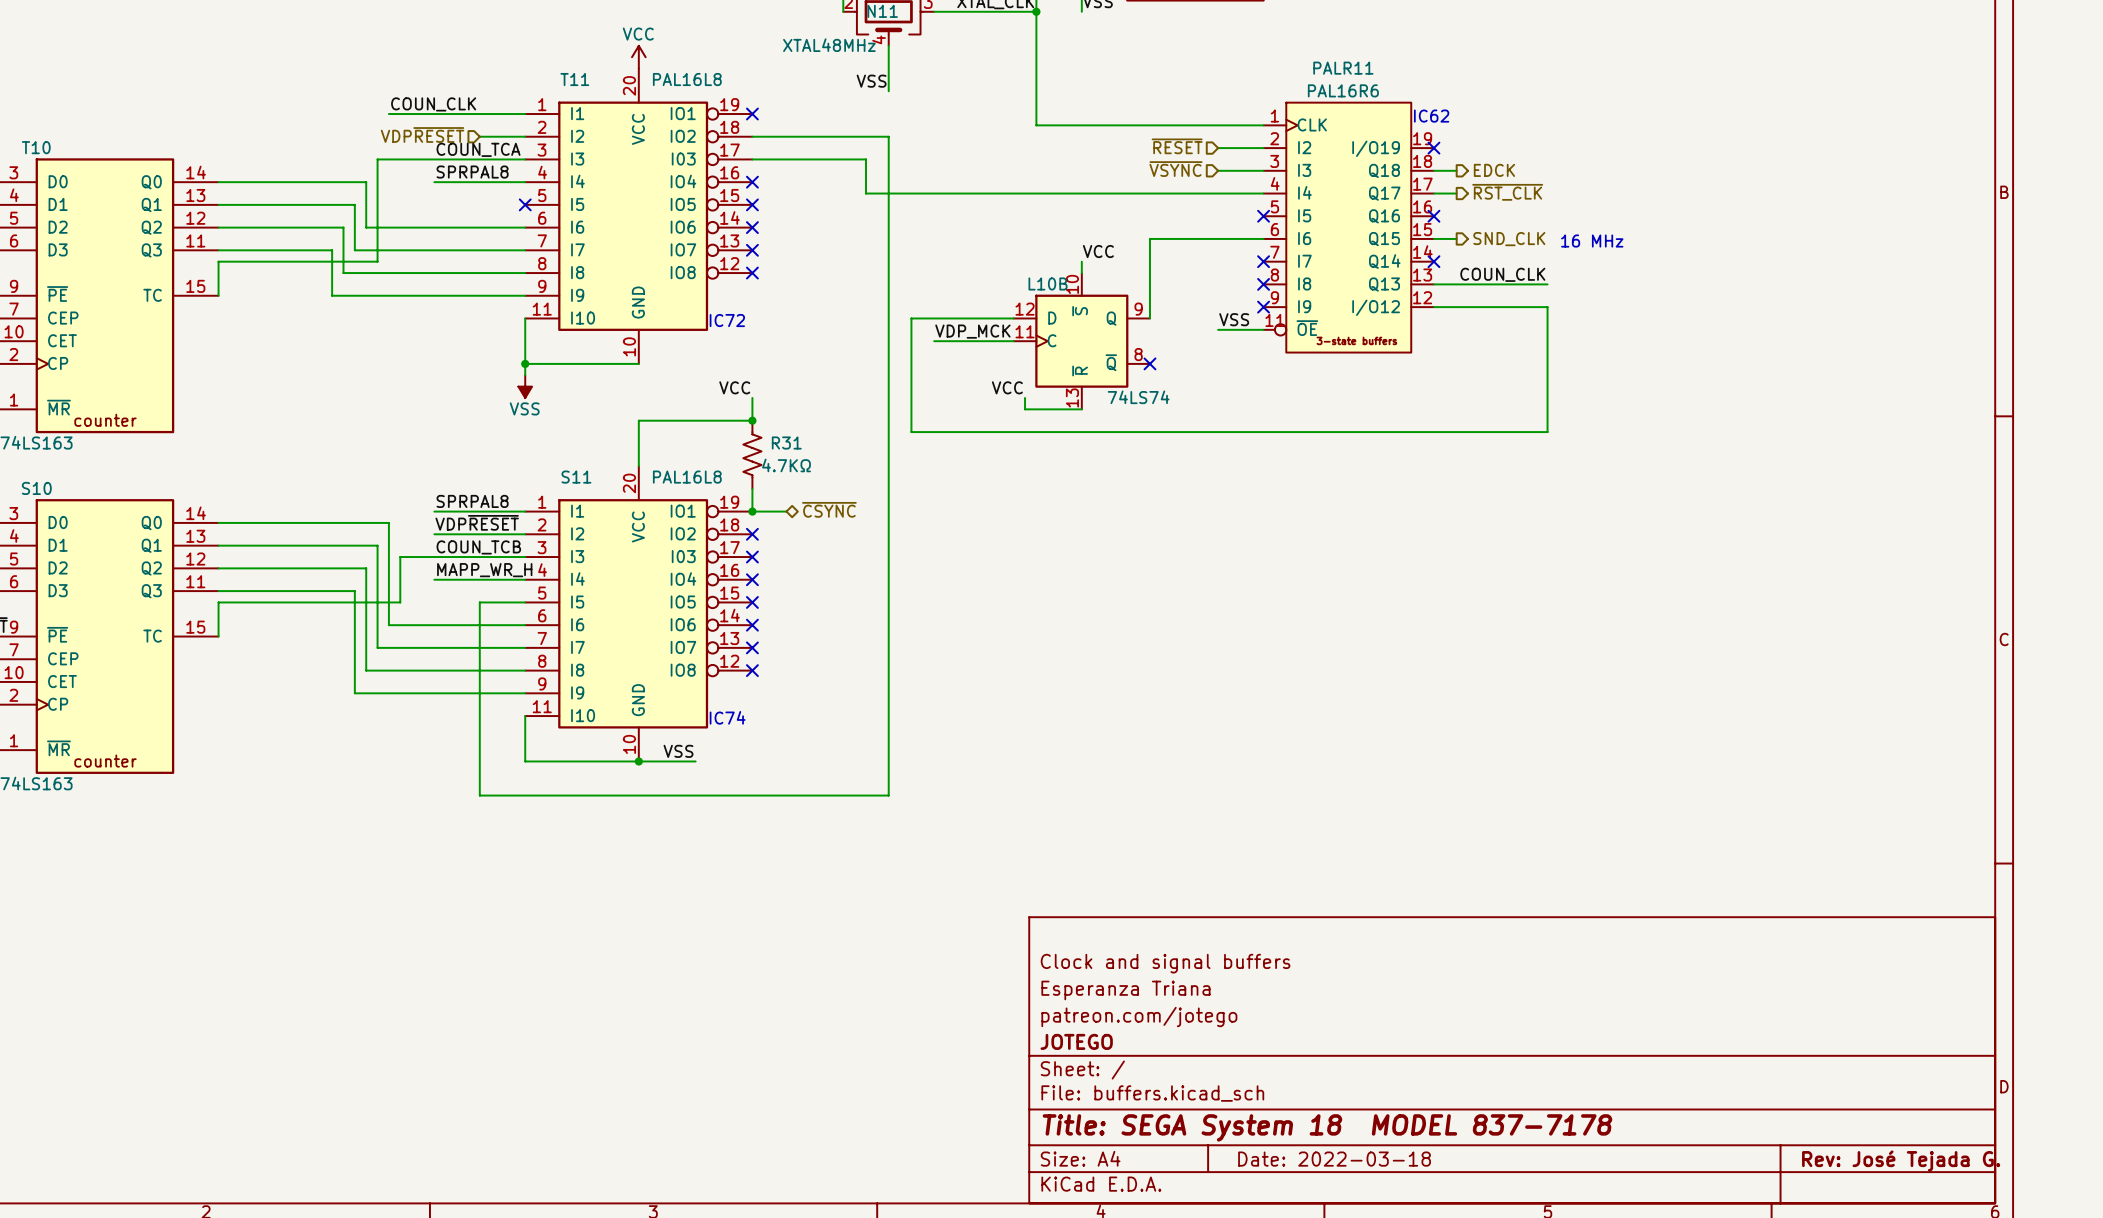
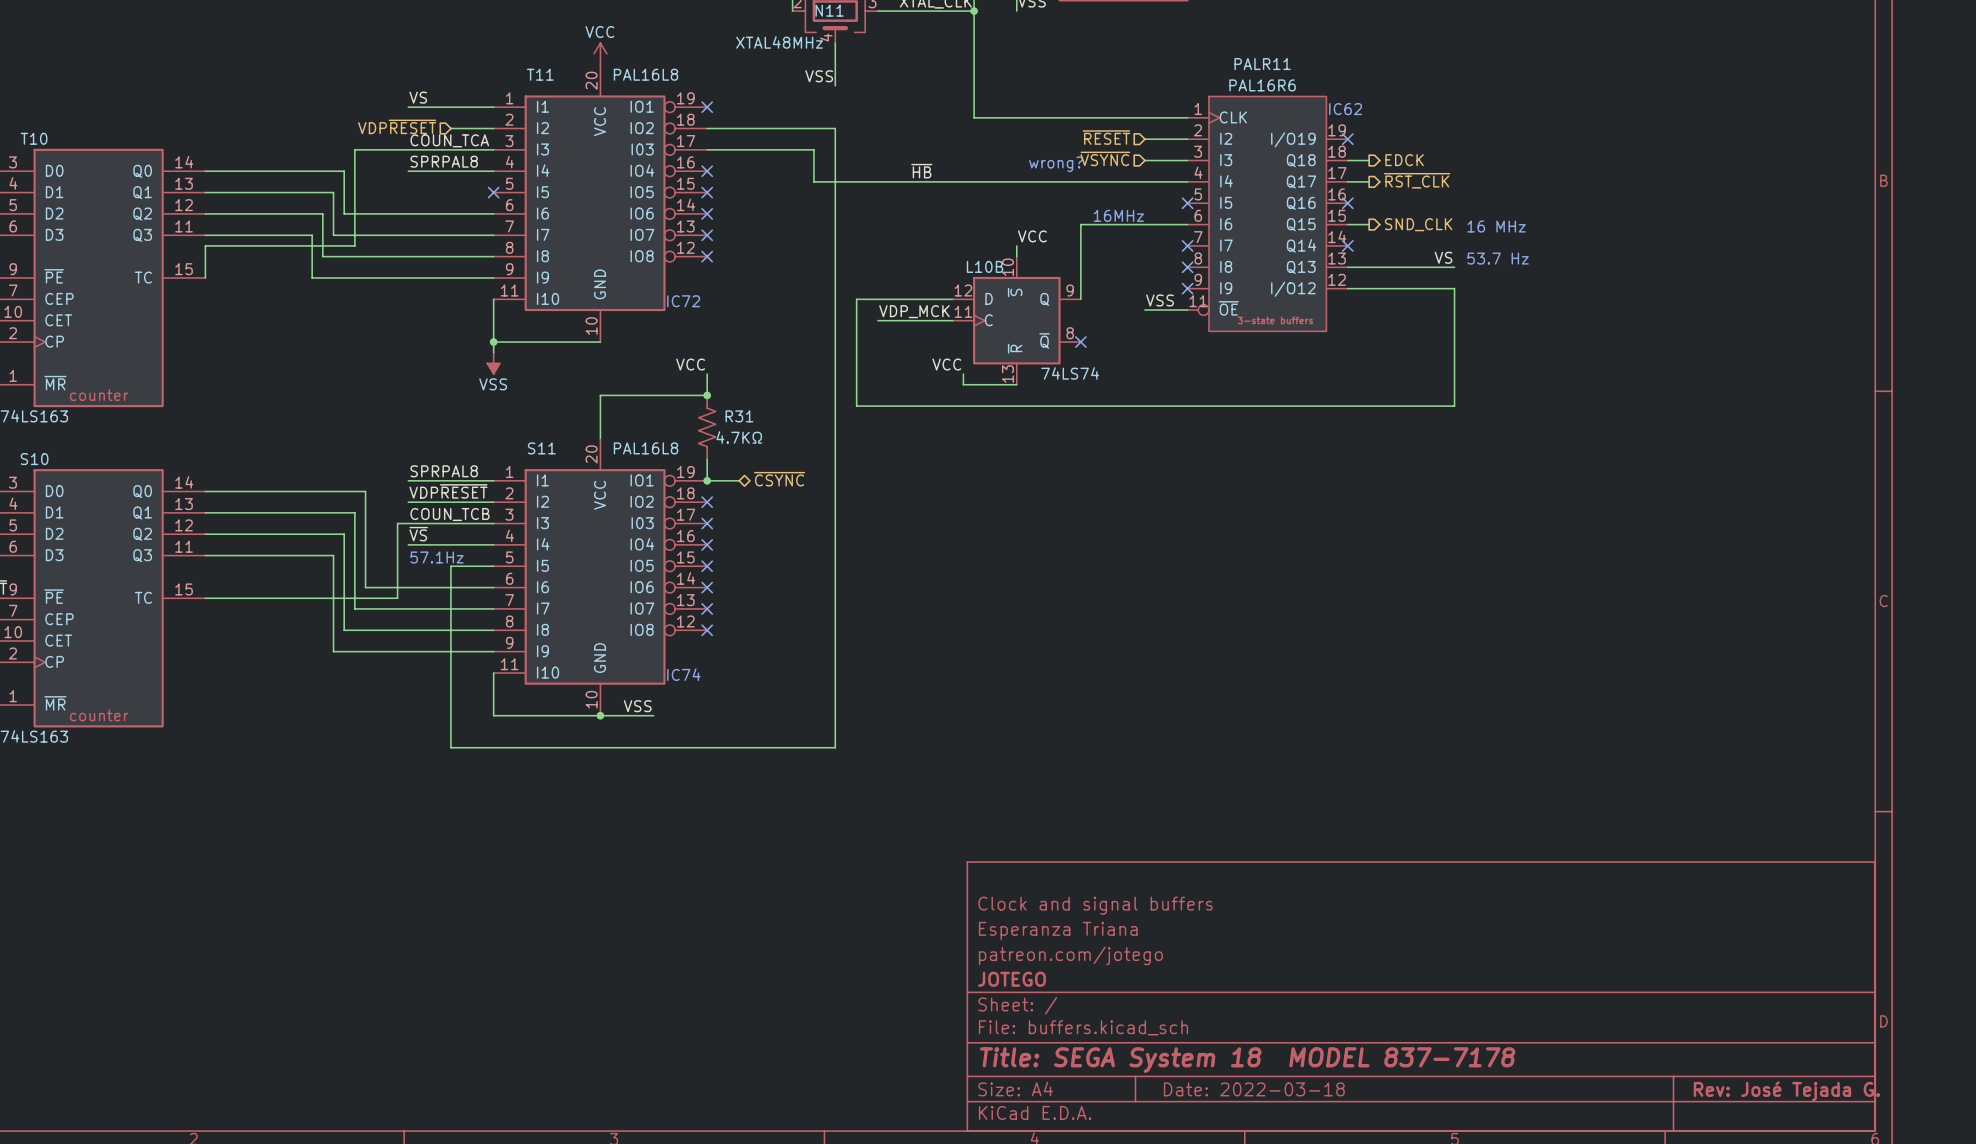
label: none -> VS (418, 97)
label: COUN_CLK (433, 104) -> none
wire: (388, 114) (434, 114) -> none
text: none -> wrong? (1056, 164)
label: none -> ~{HB} (921, 171)
text: none -> 16MHz (1118, 215)
label: COUN_CLK (1502, 274) -> VS (1443, 257)
text: none -> 53.7 Hz (1498, 258)
wire: (423, 557) (400, 557) (400, 602) (218, 602) (218, 636) -> (397, 523) (397, 598) (205, 598)
label: MAPP_WR_H (484, 570) -> ~{VS} (418, 534)
text: none -> 57.1Hz (437, 557)

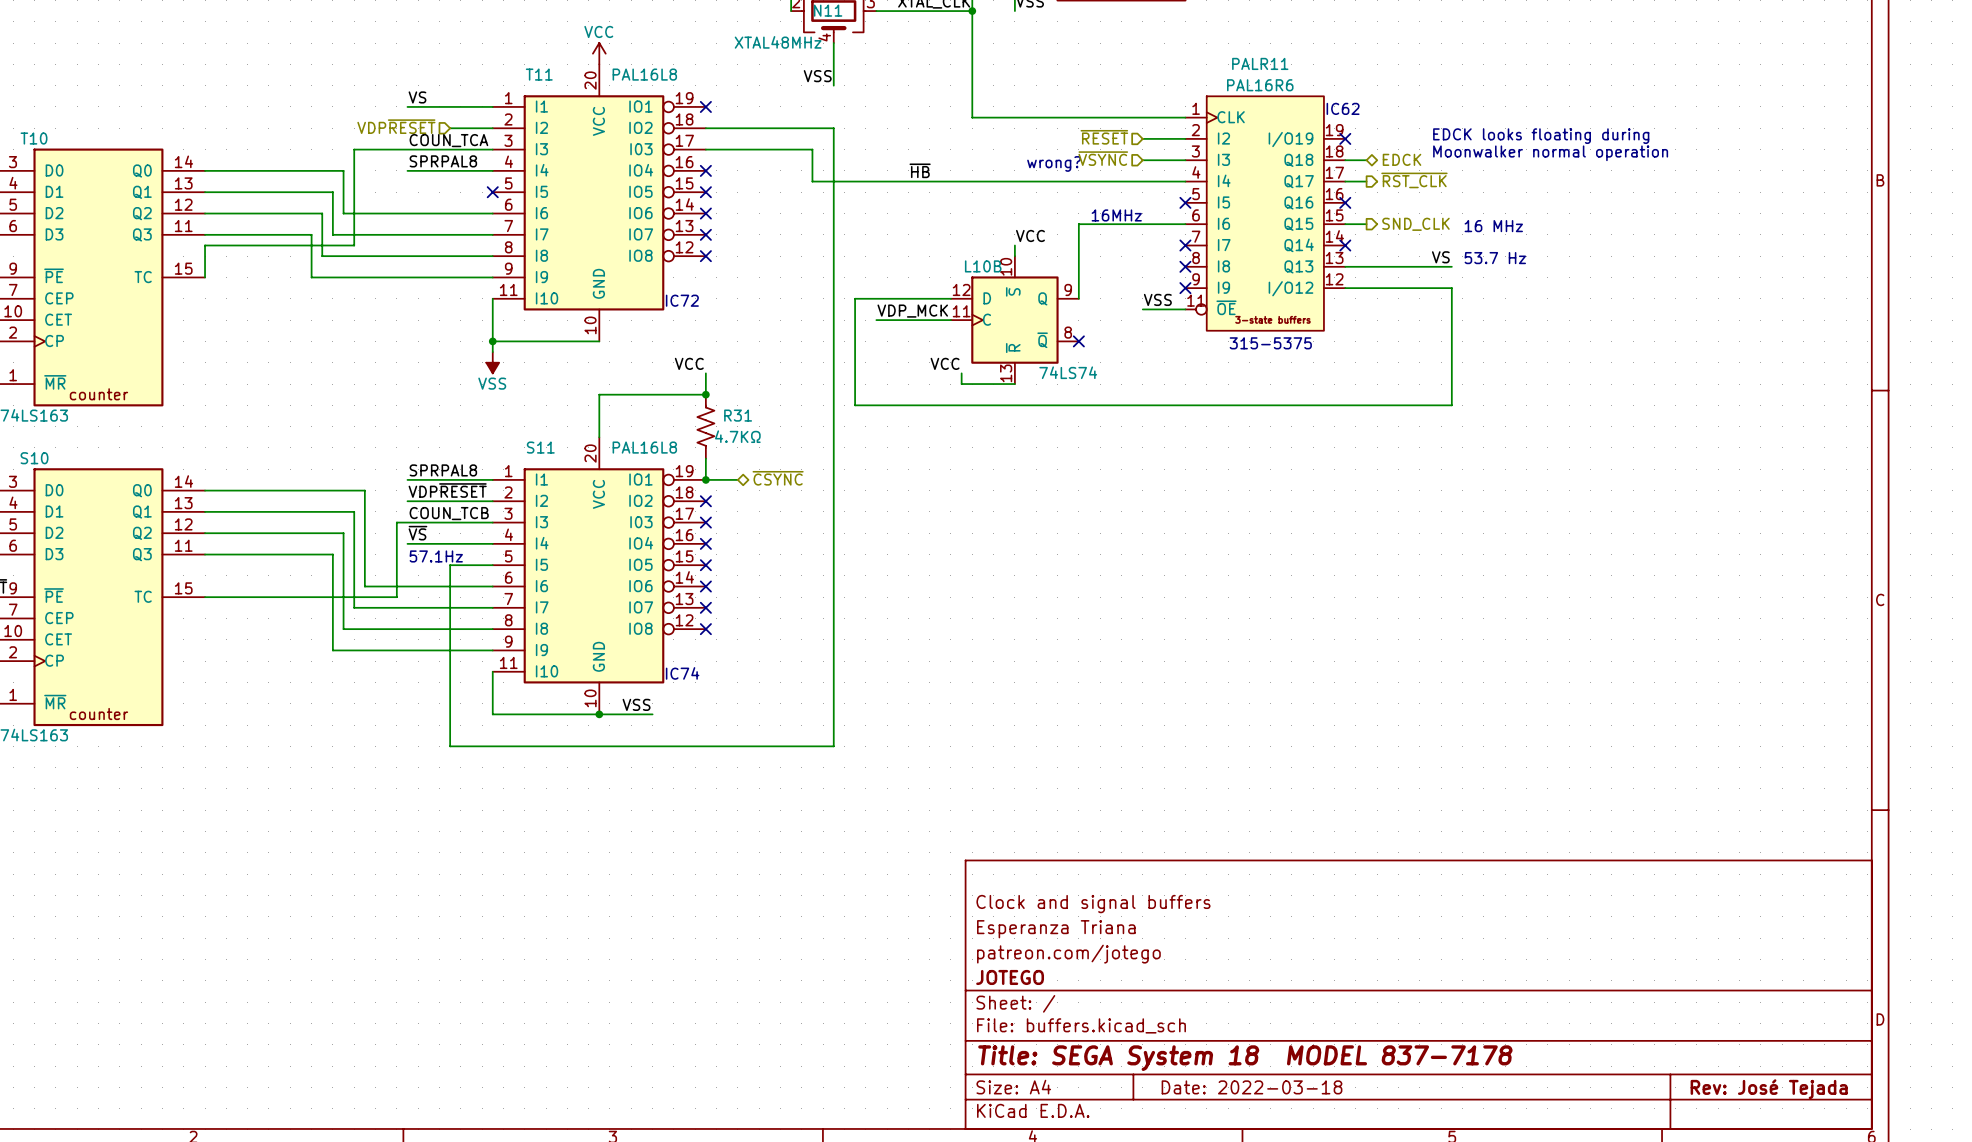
text: none -> EDCK looks floating during (1541, 136)
text: none -> Moonwalker normal operation (1550, 153)
hierarchical label shape: output (1404, 160) -> bidirectional (1402, 159)
text: none -> 315-5375 (1270, 343)
title block: Rev: José Tejada G. (1786, 1091) -> Rev: José Tejada (1769, 1089)

